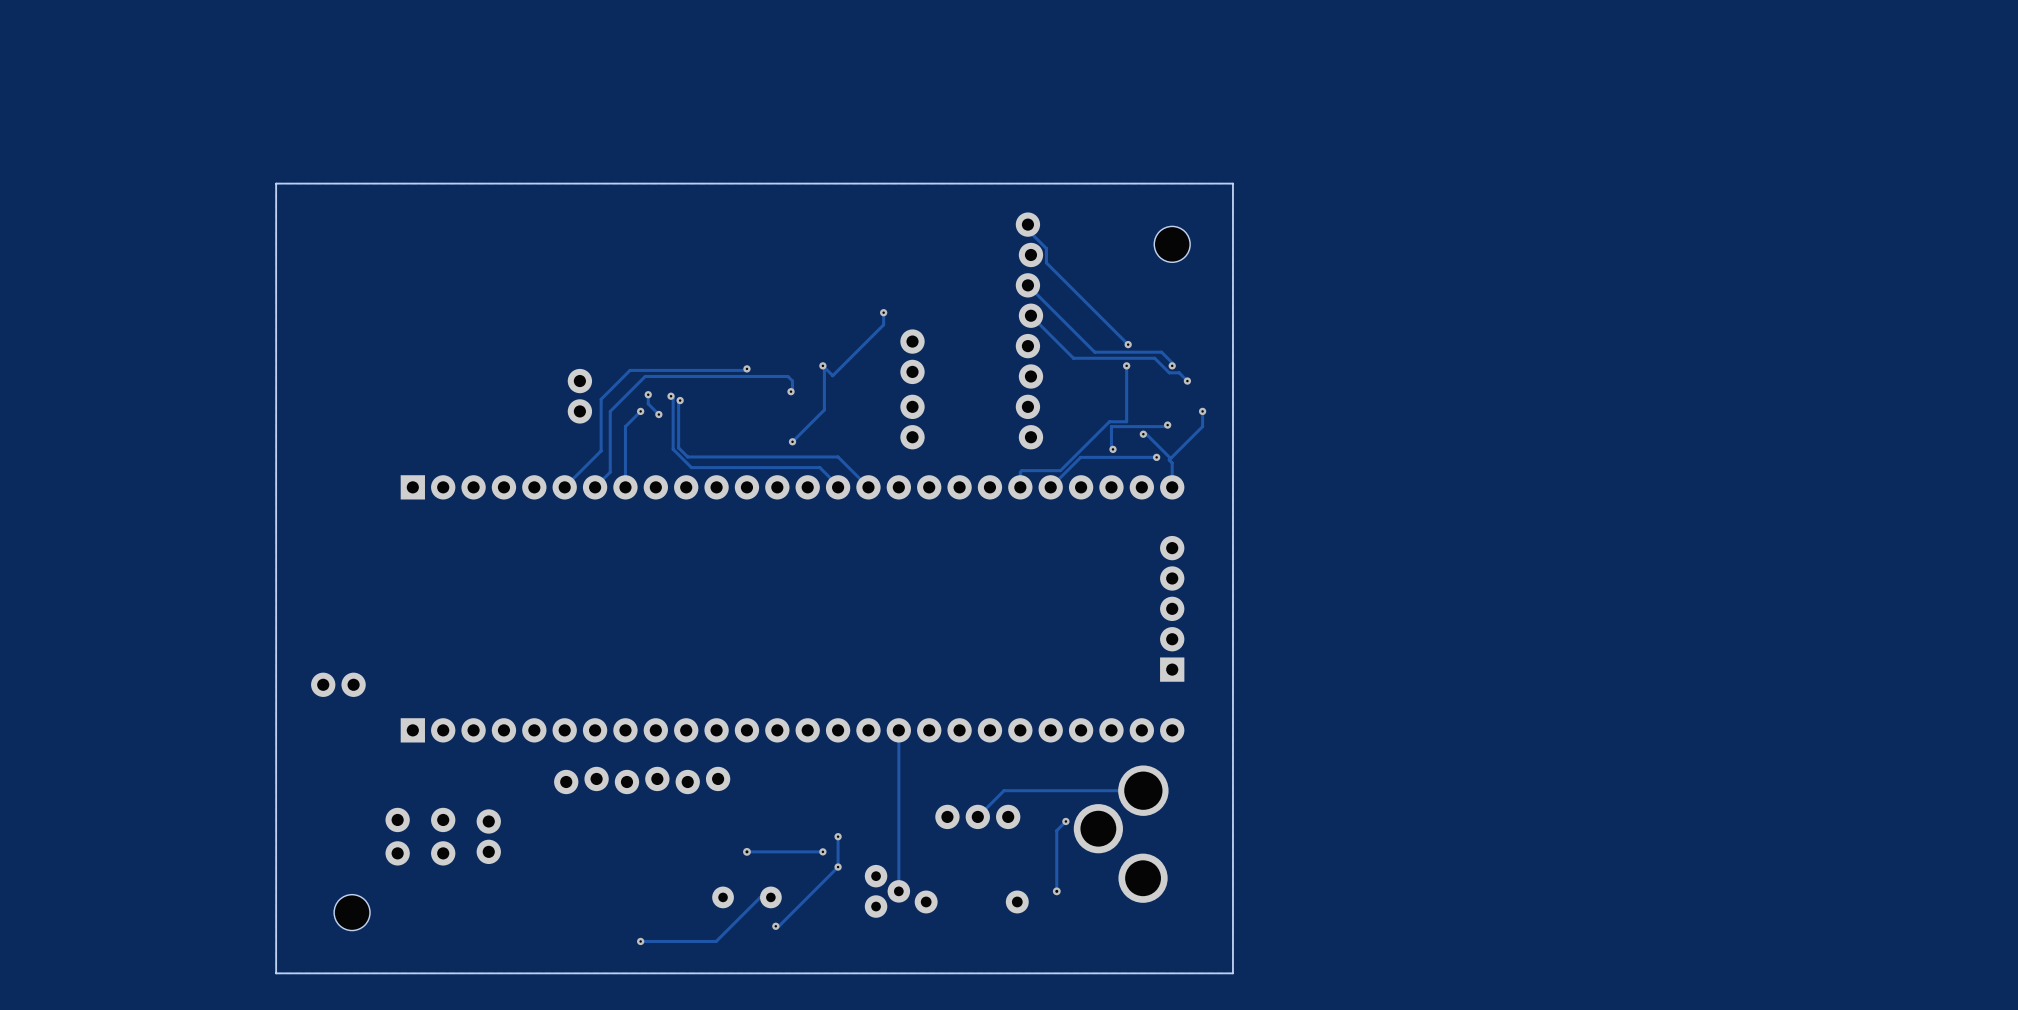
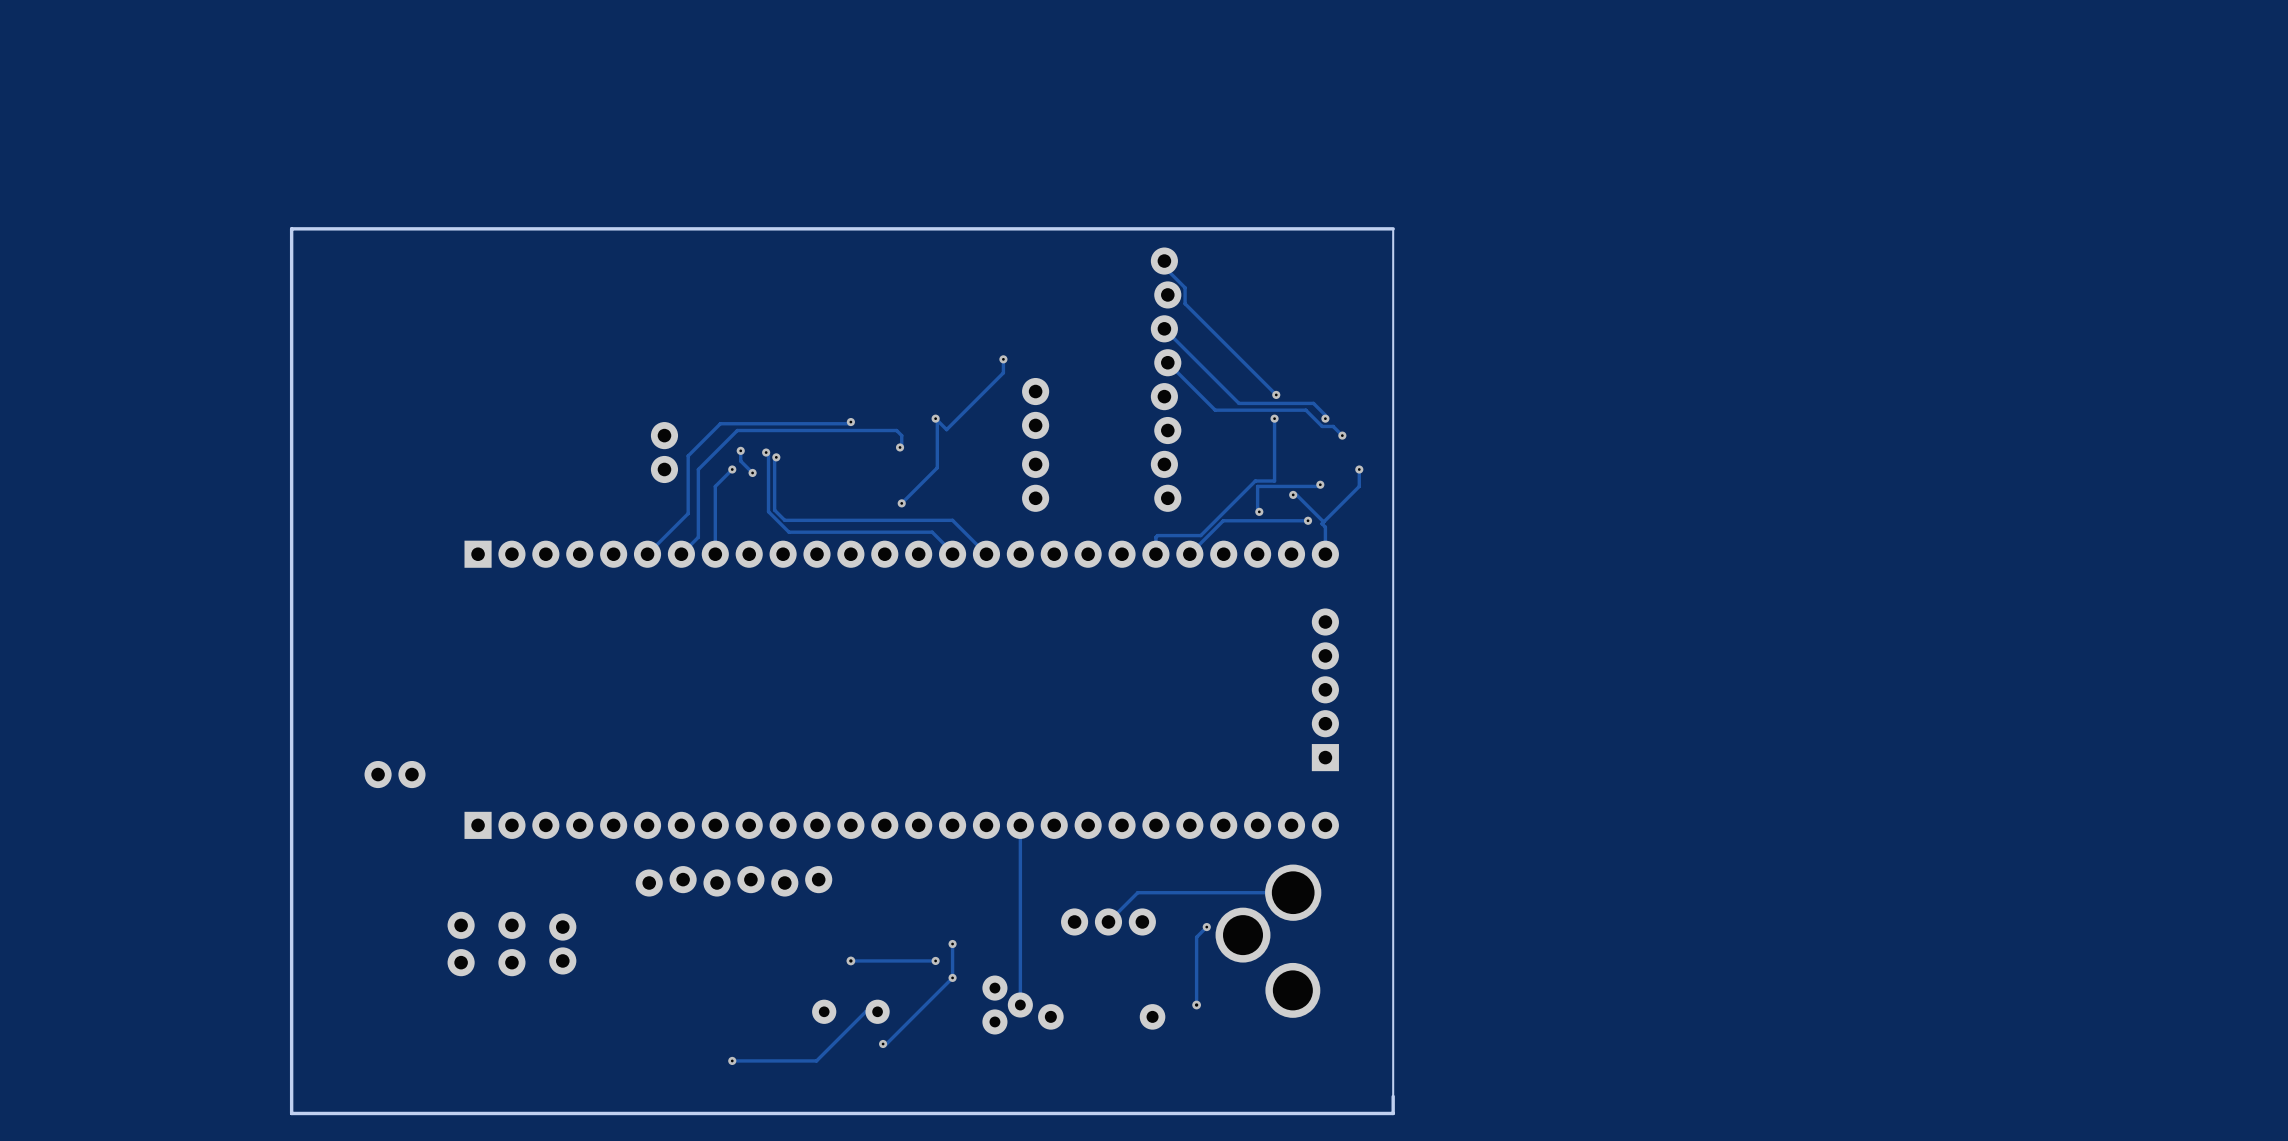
board edge: (1232, 195) (1232, 183) (276, 183) (276, 973) (1232, 973) -> (1393, 228) (291, 228) (291, 1113) (1393, 1113) (1393, 1096)
hole: (1172, 244) -> none
hole: (352, 912) -> none

